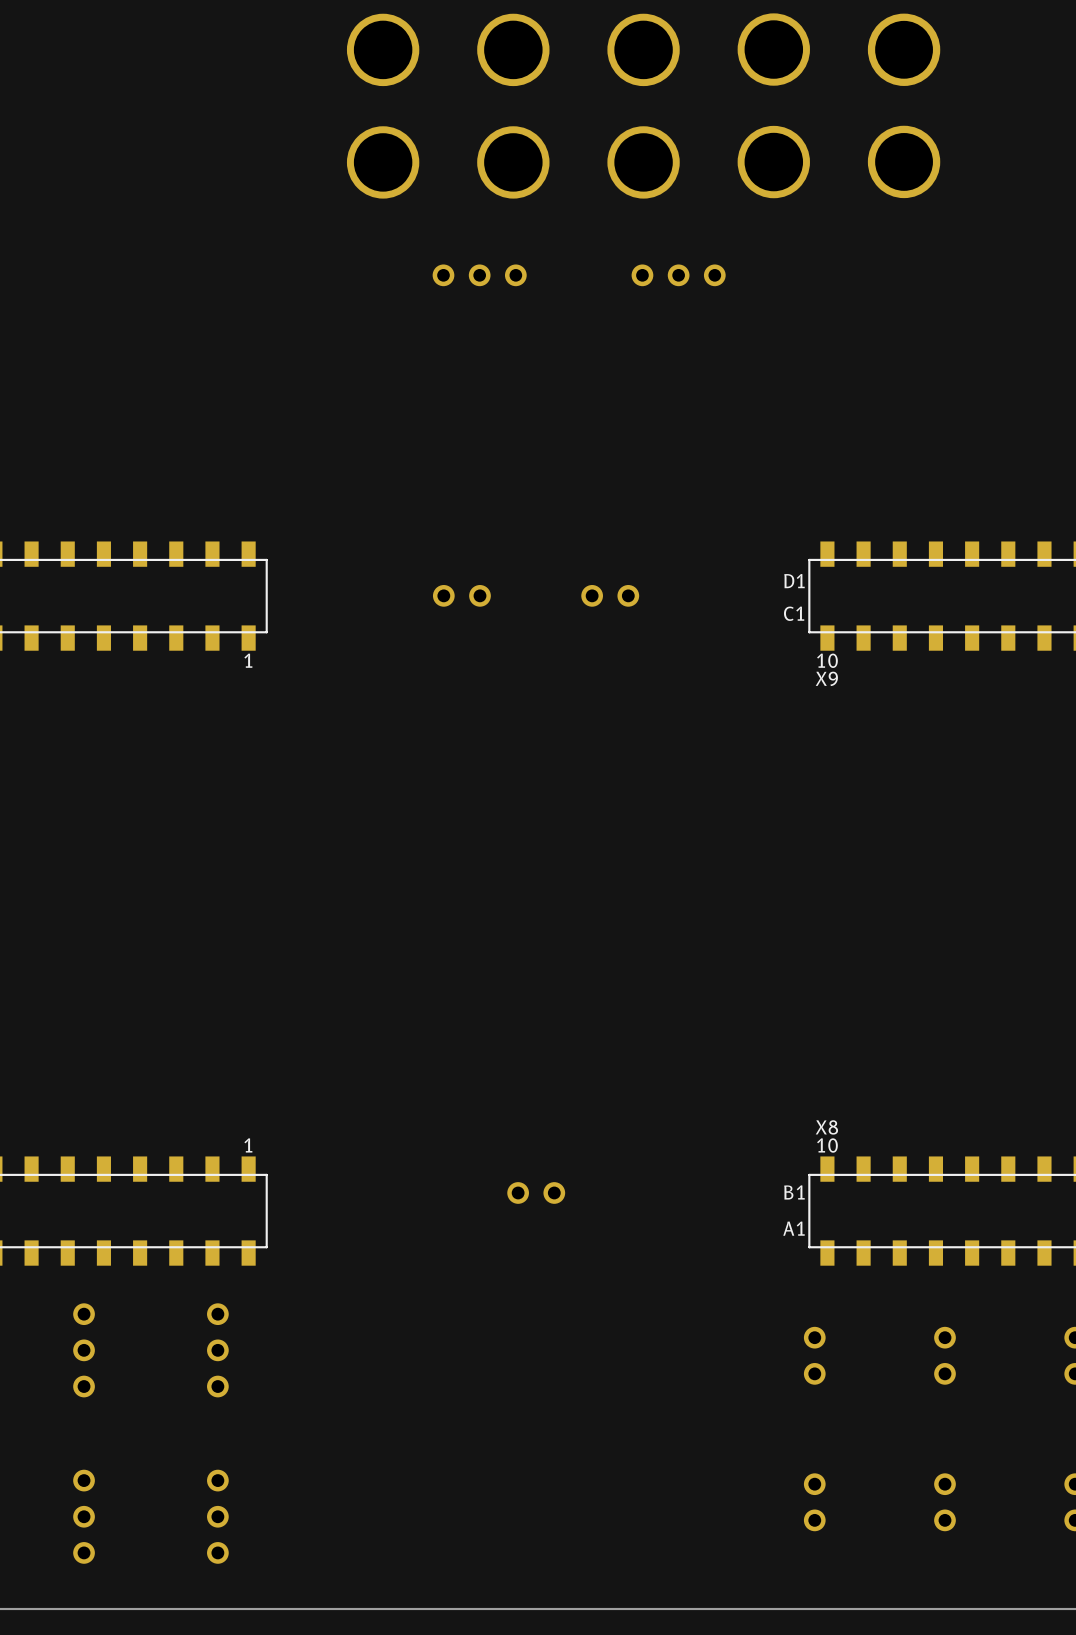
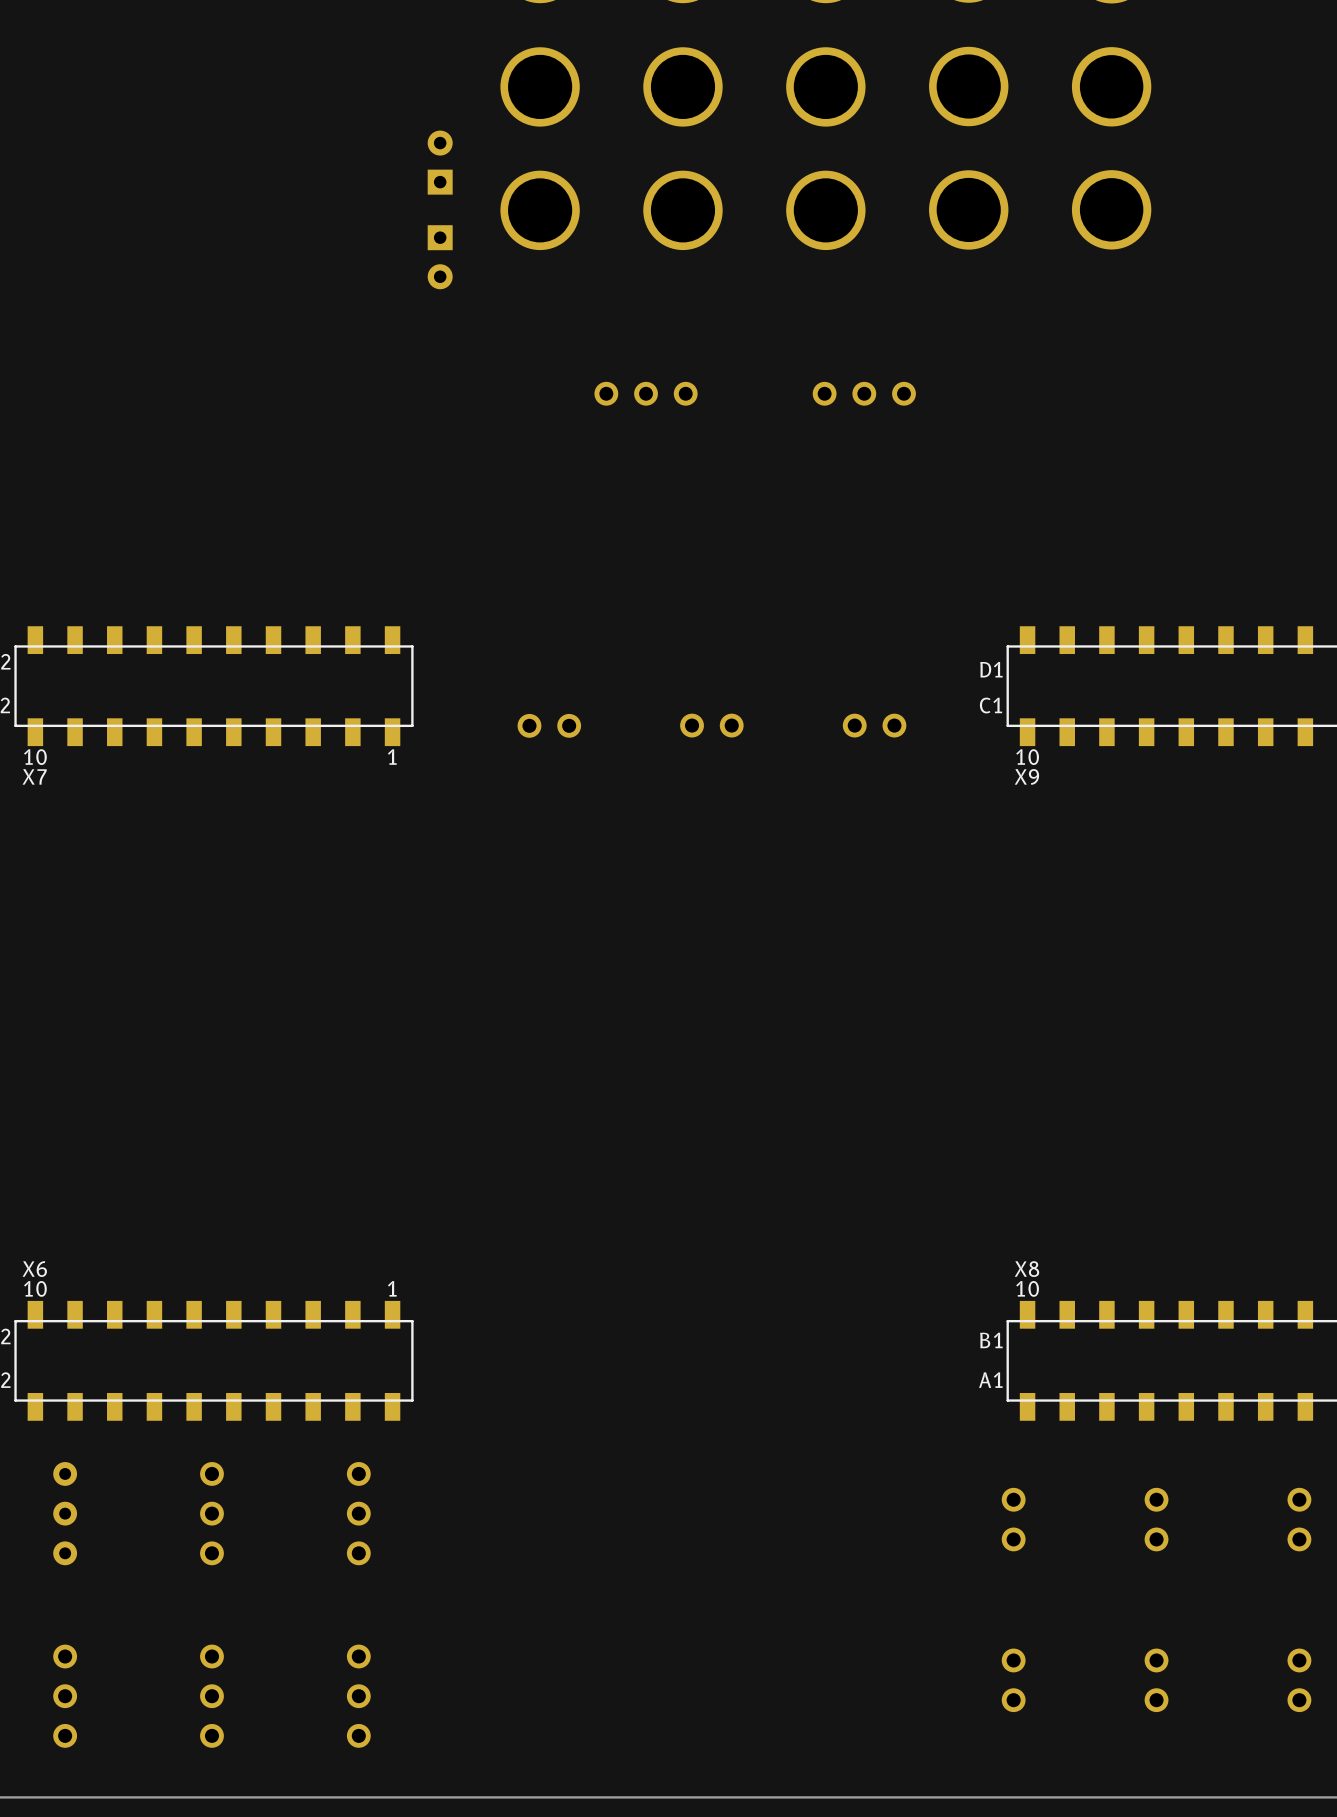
part: none -> (440, 162)
part: none -> (440, 257)
part position: (479, 275) -> (646, 393)
part position: (678, 275) -> (864, 393)
part: (461, 595) -> none
part: (610, 595) -> none
part: none -> (549, 725)
part: none -> (711, 725)
part: none -> (874, 725)
part: (536, 1192) -> none

